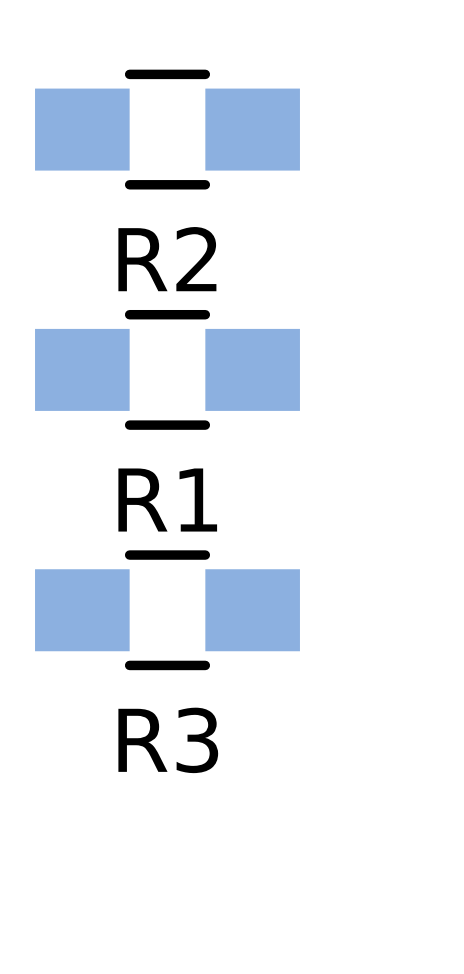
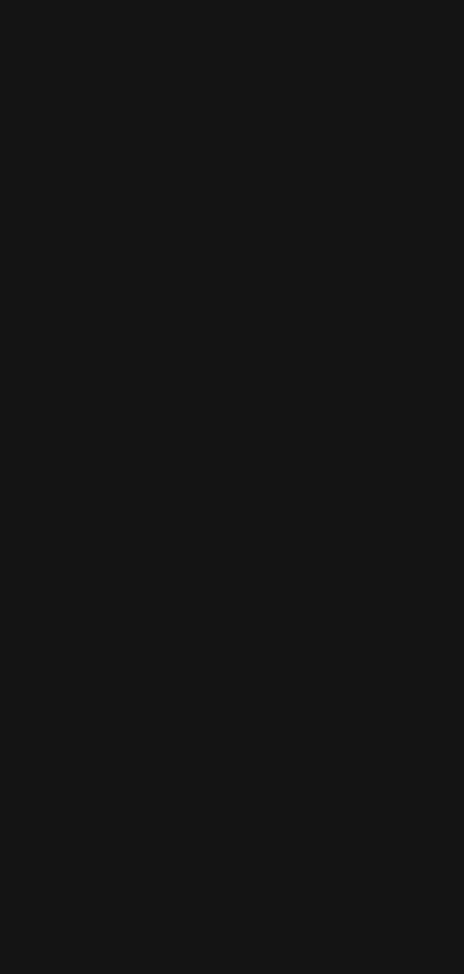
R2: (167, 129) -> none
R1: (167, 369) -> none
R3: (167, 610) -> none

